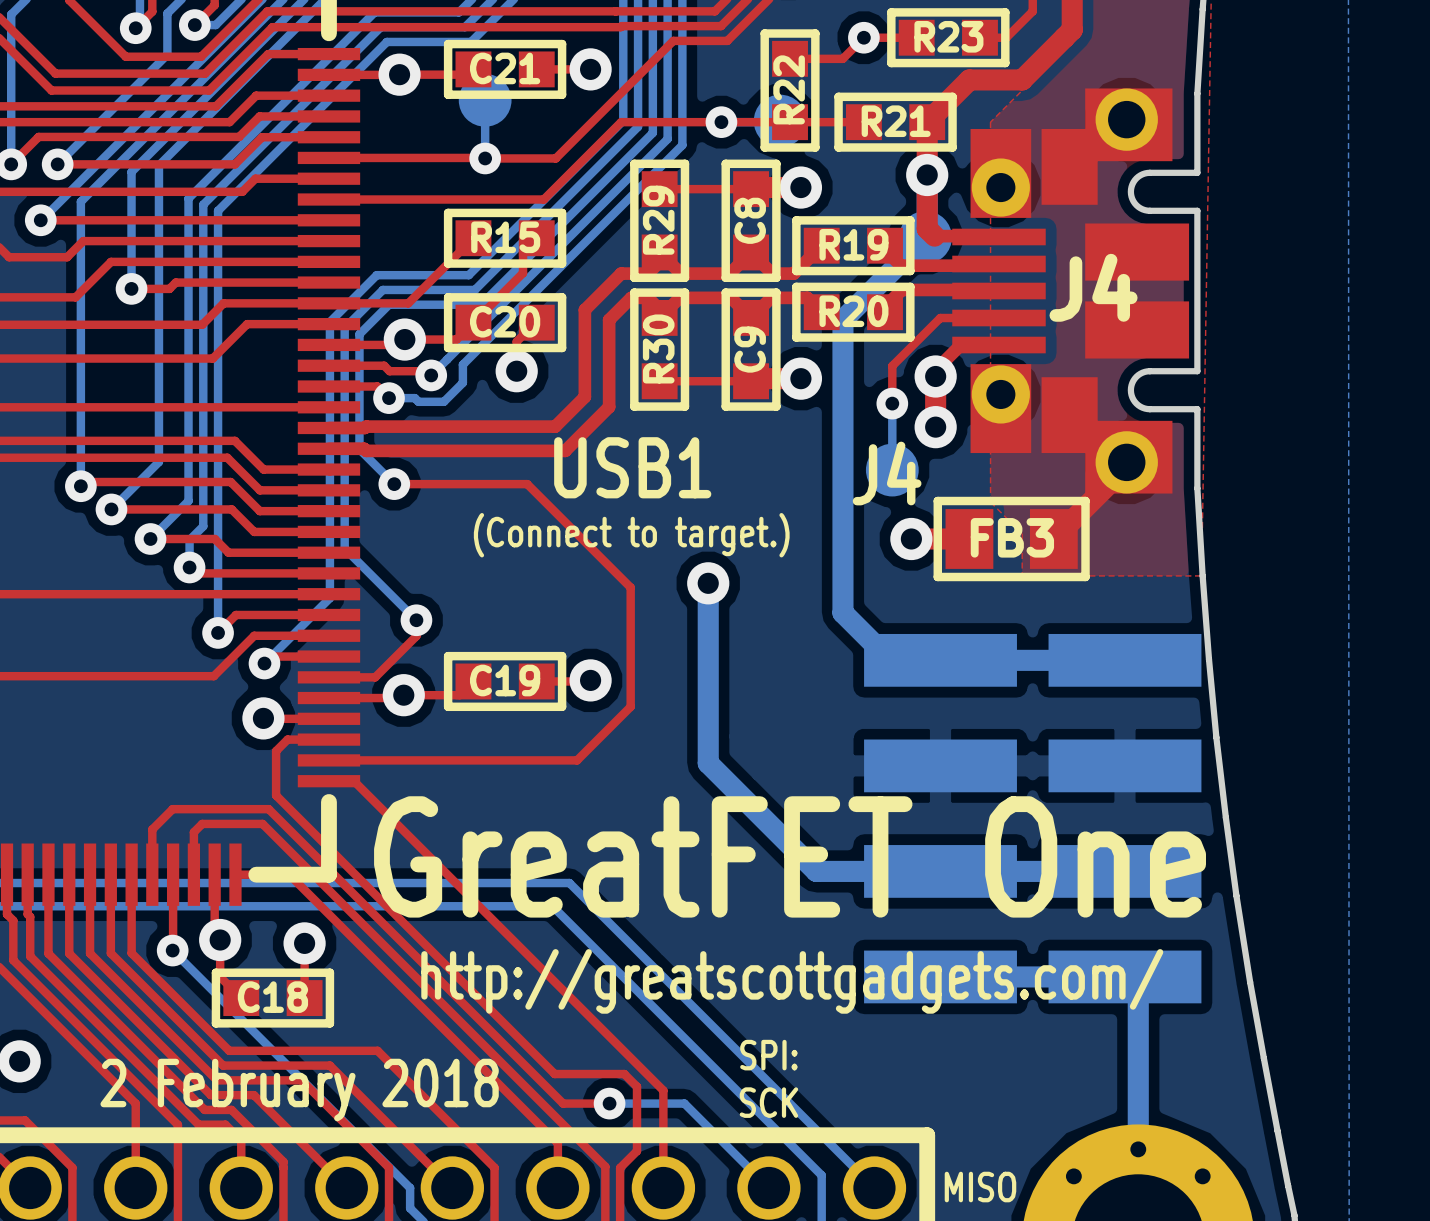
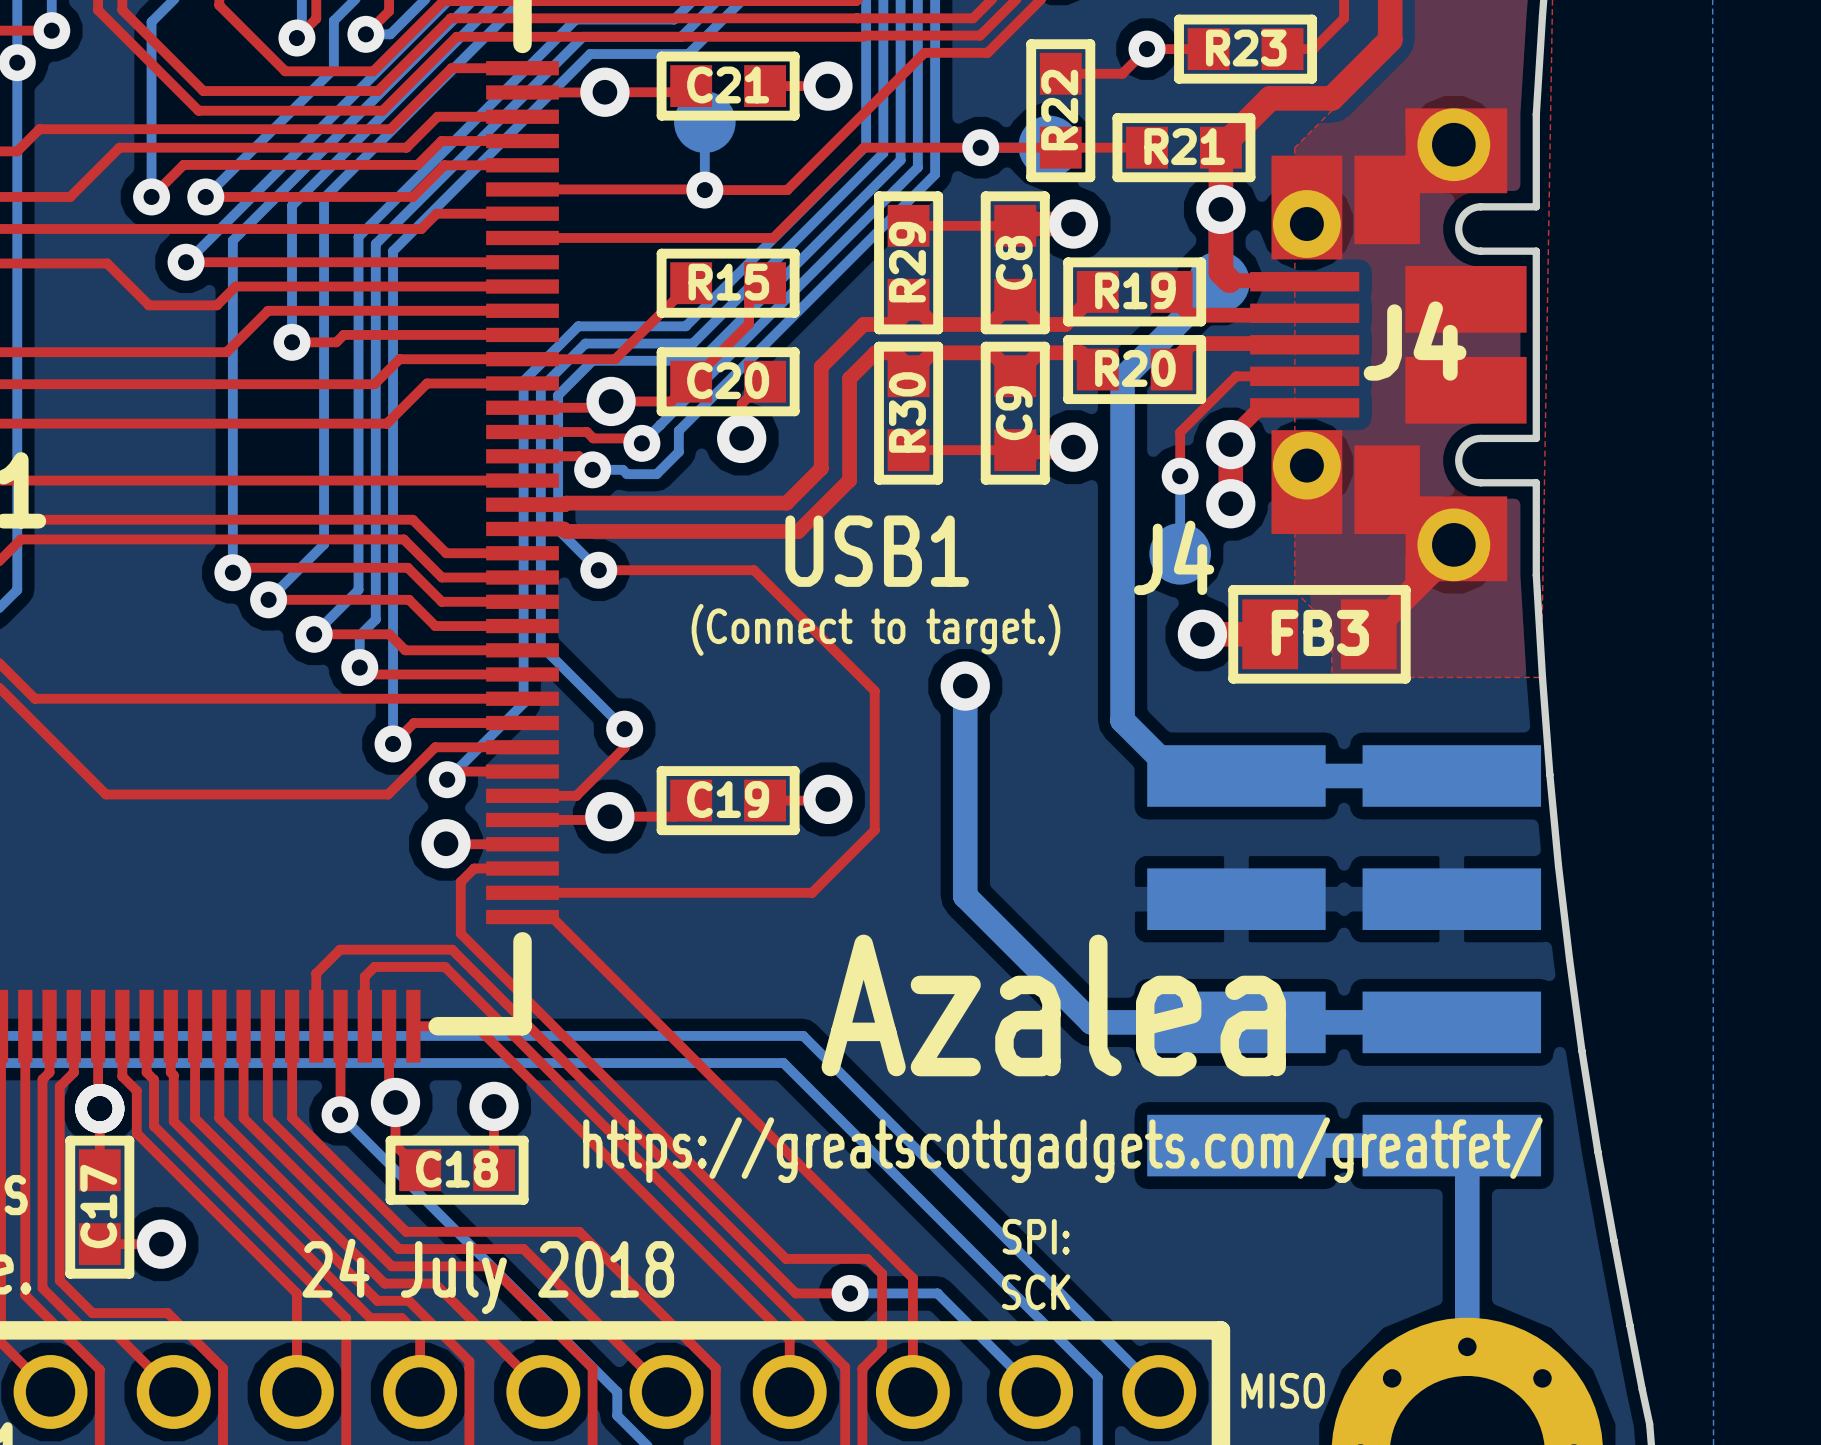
text: GreatFET One (790, 856) -> Azalea (1053, 1005)
text: http://greatscottgadgets.com/ (792, 981) -> https://greatscottgadgets.com/greatfet/ (1062, 1150)
text: 2 February 2018 (299, 1090) -> 24 July 2018 (488, 1276)

